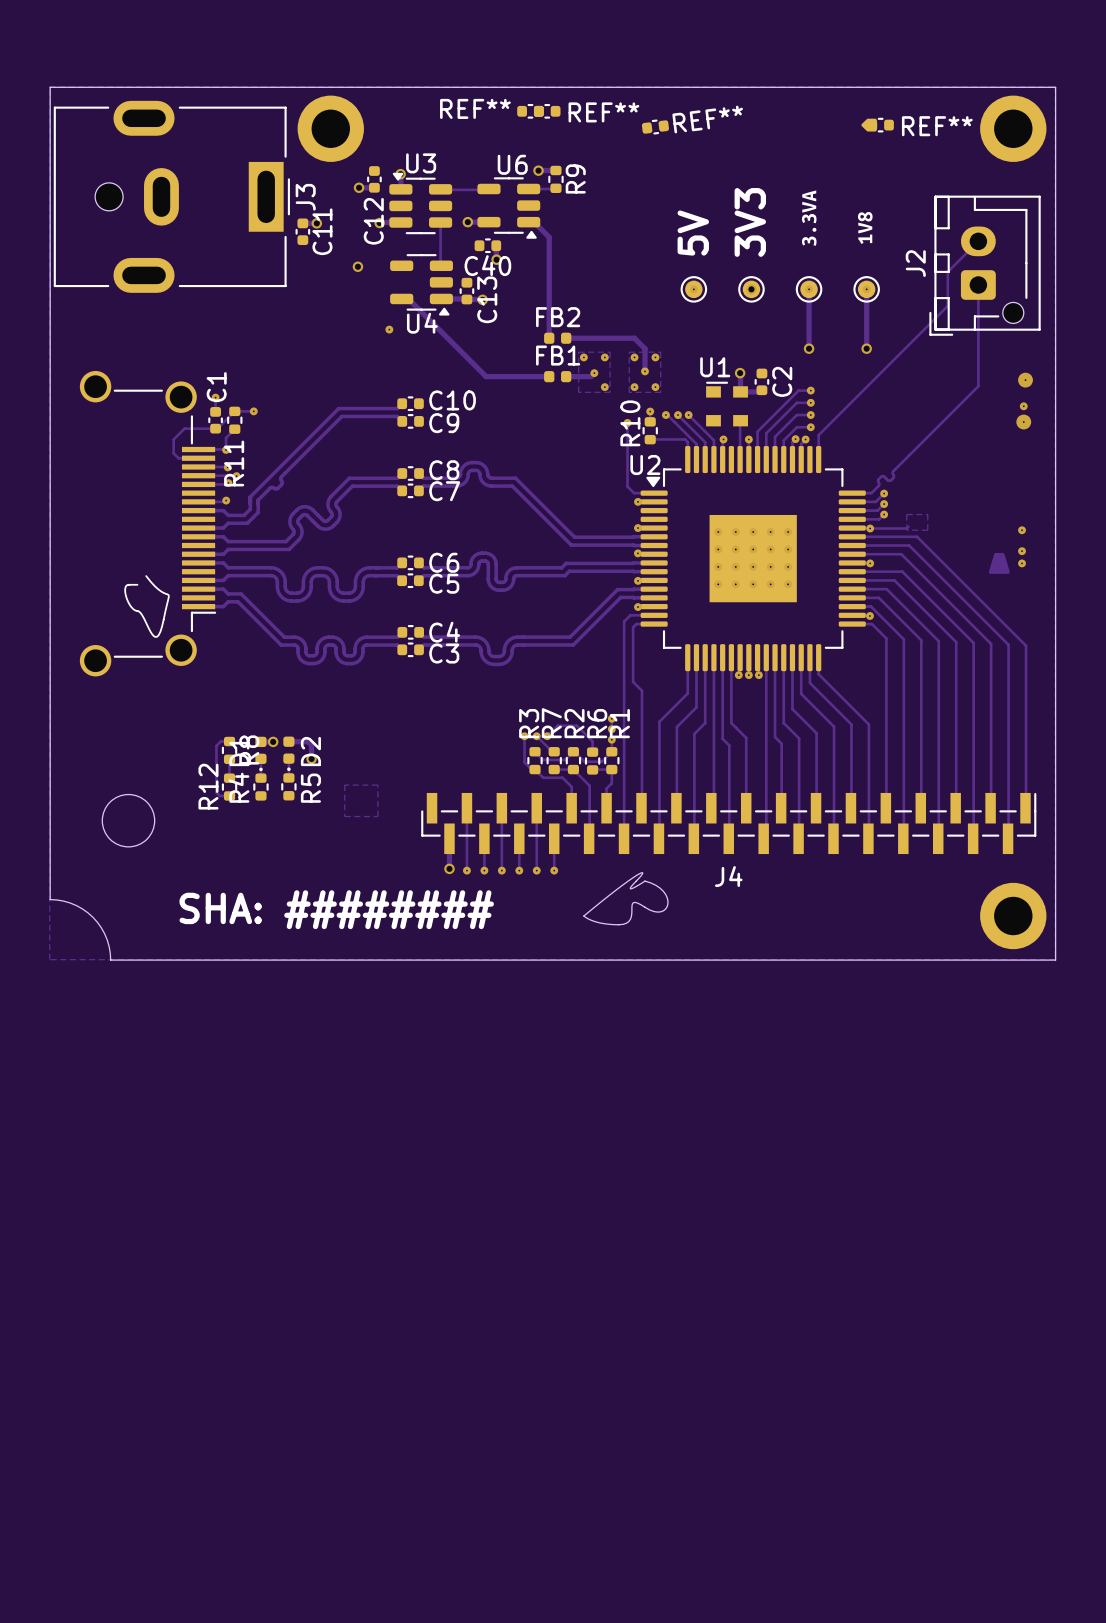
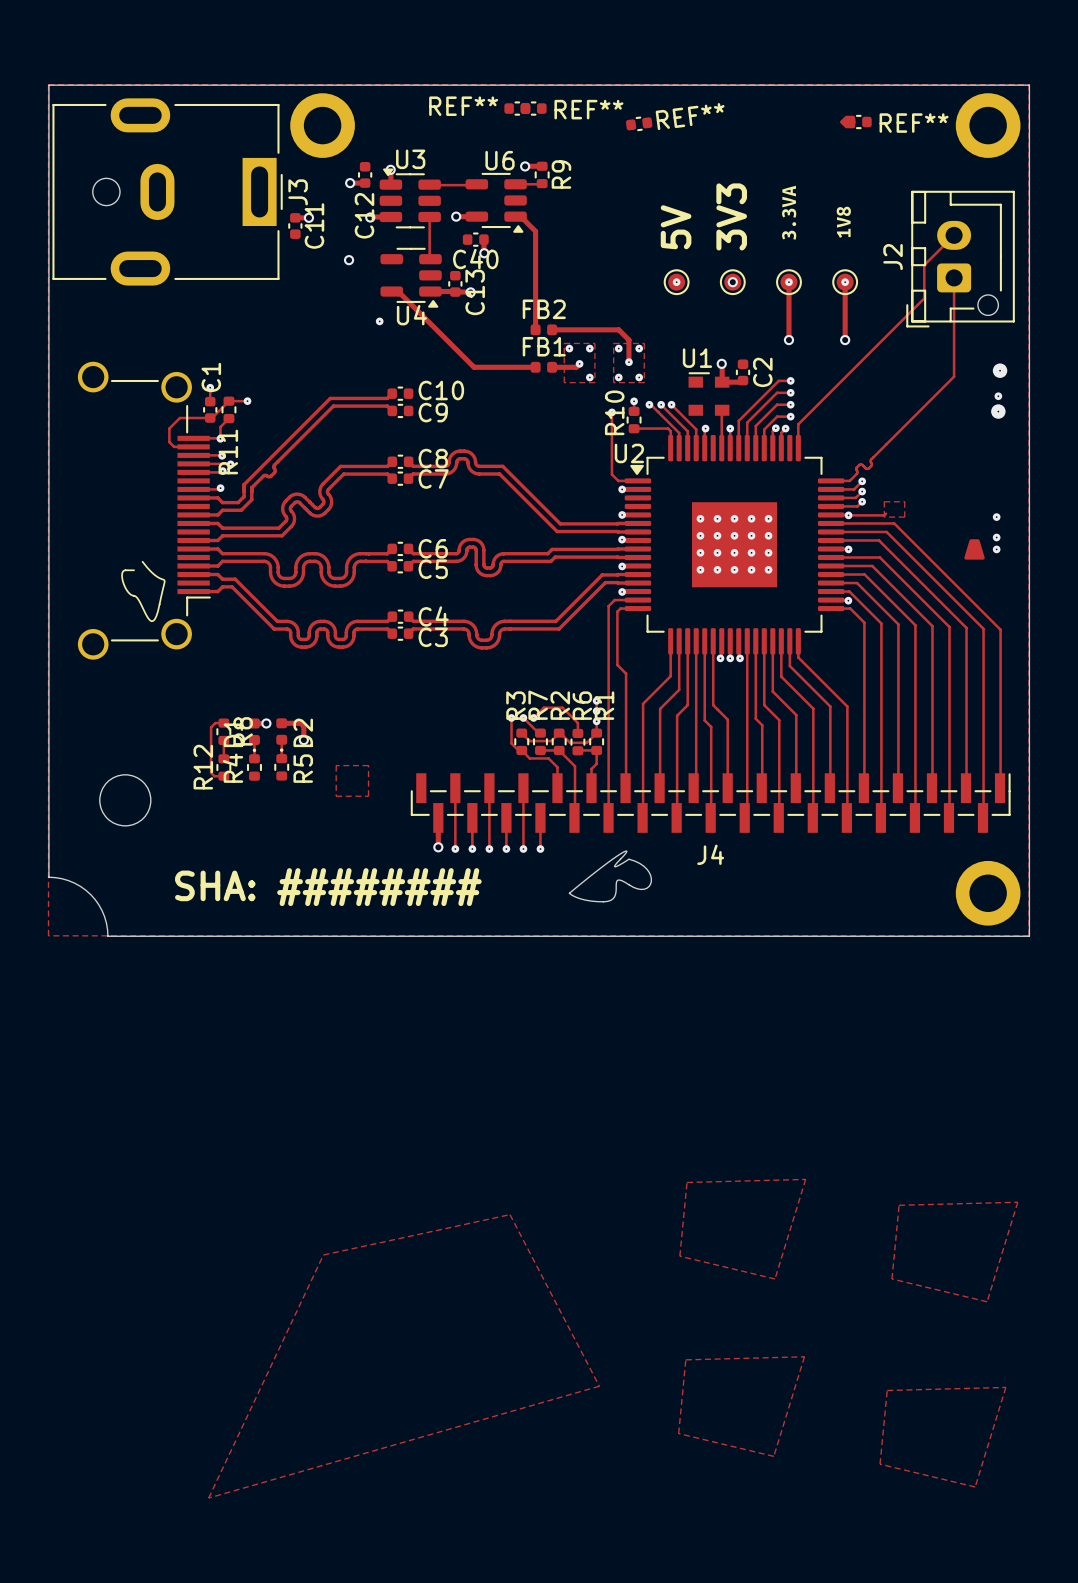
zone outline: none -> (805, 1179) (687, 1182) (679, 1256) (775, 1278) (805, 1179)
zone outline: none -> (1017, 1202) (899, 1205) (891, 1278) (987, 1301) (1017, 1202)
zone outline: none -> (509, 1214) (323, 1254) (208, 1498) (599, 1386) (509, 1214)
zone outline: none -> (804, 1356) (685, 1359) (678, 1433) (773, 1456) (804, 1356)
zone outline: none -> (1005, 1387) (887, 1390) (880, 1464) (975, 1487) (1005, 1387)

